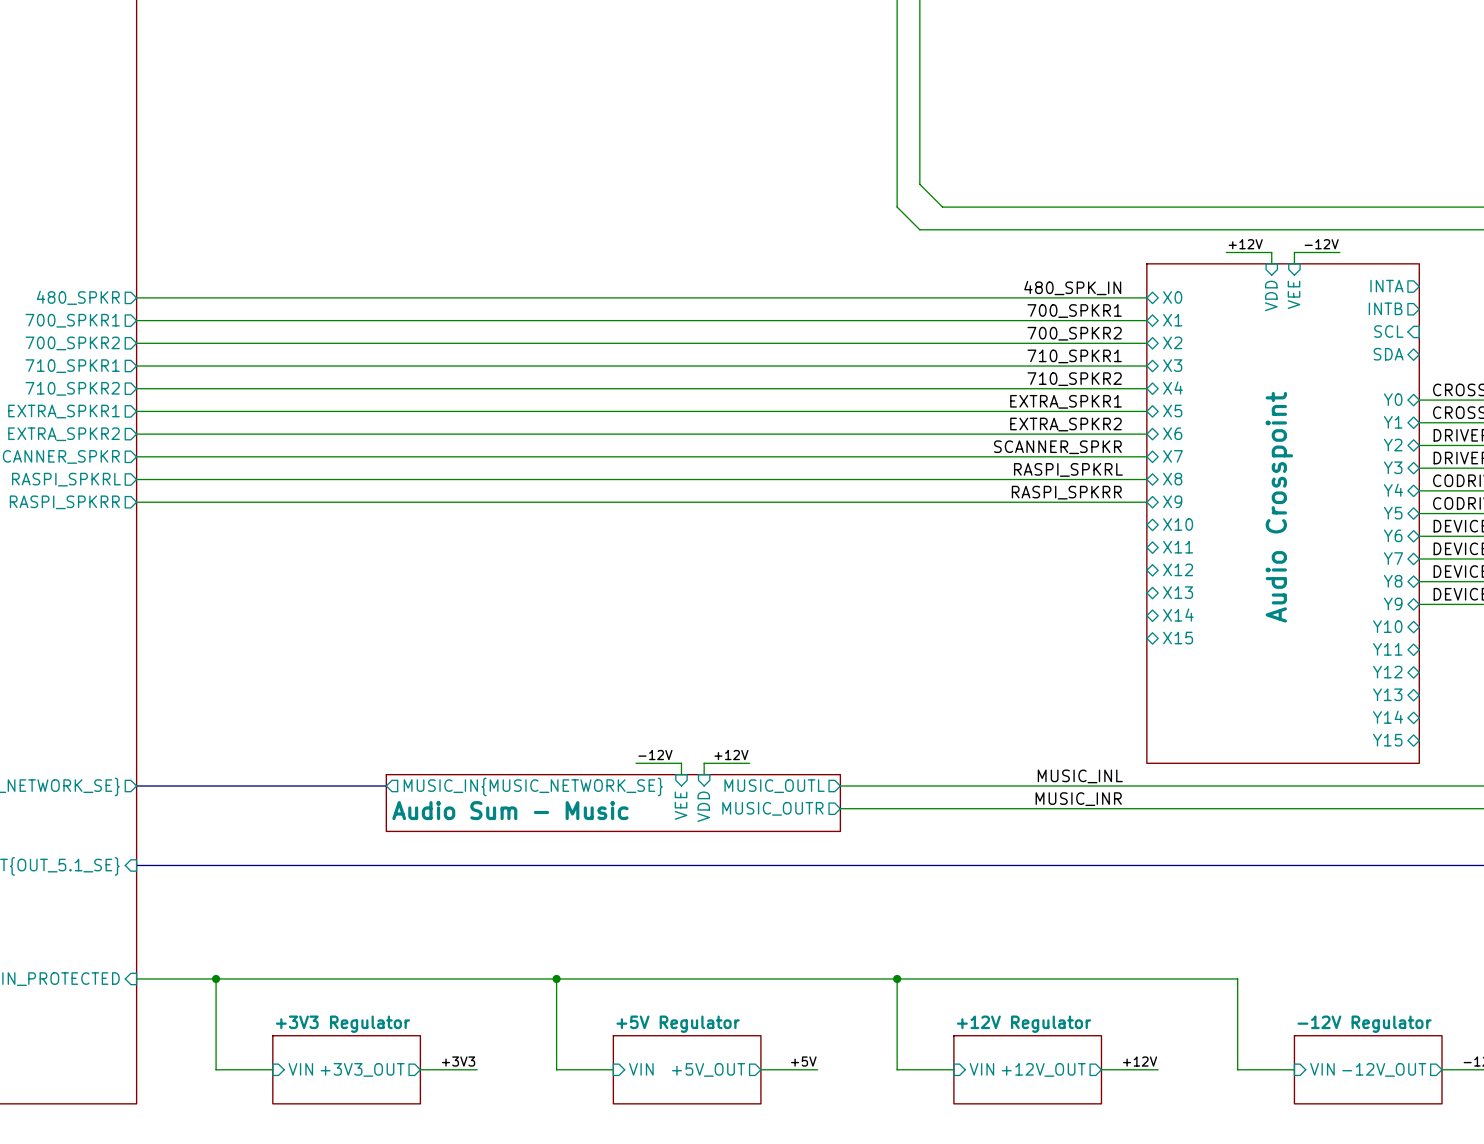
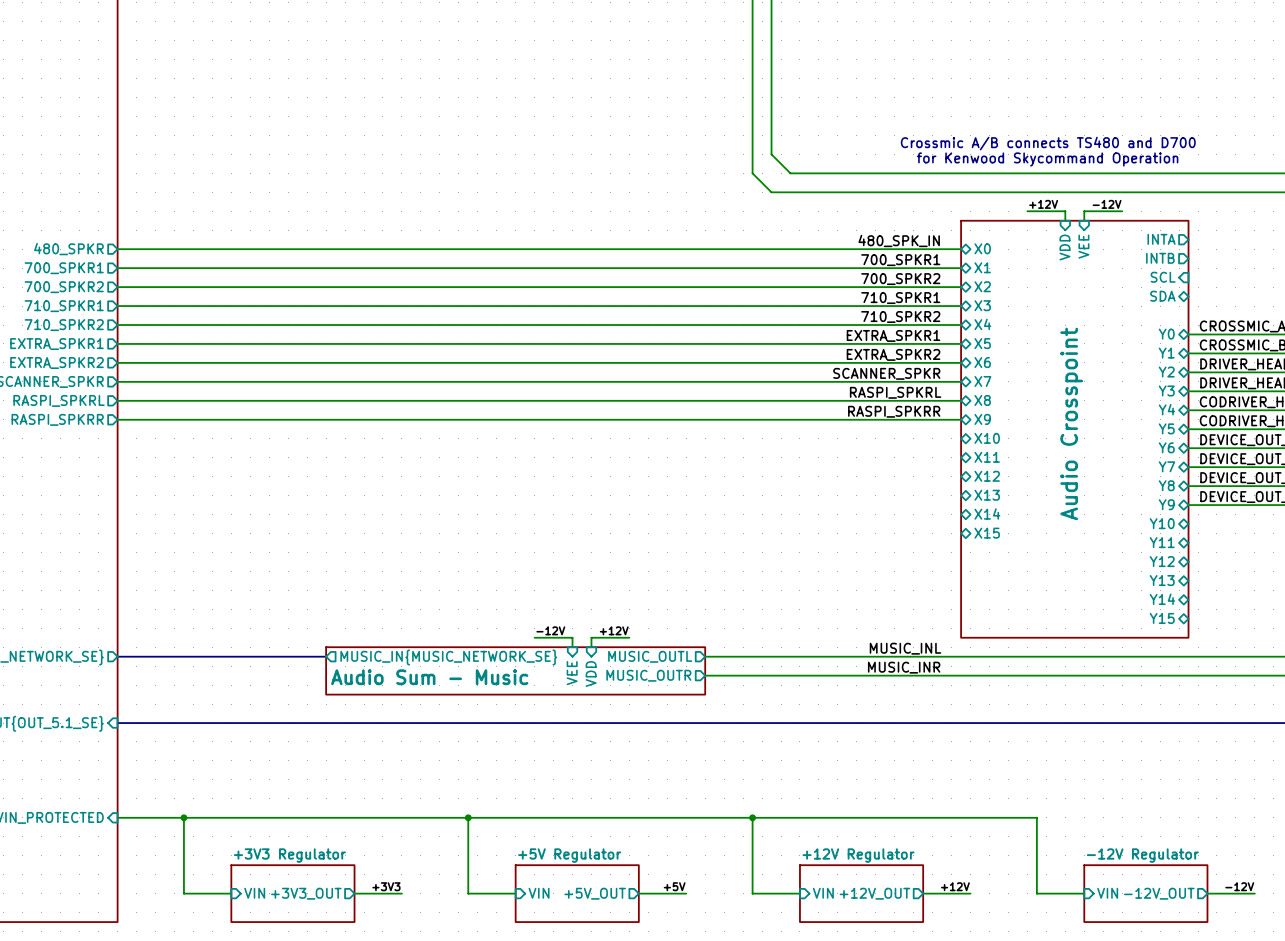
text: none -> Crossmic A/B connects TS480 and D700 (1048, 143)
text: none -> for Kenwood Skycommand Operation (1047, 159)

